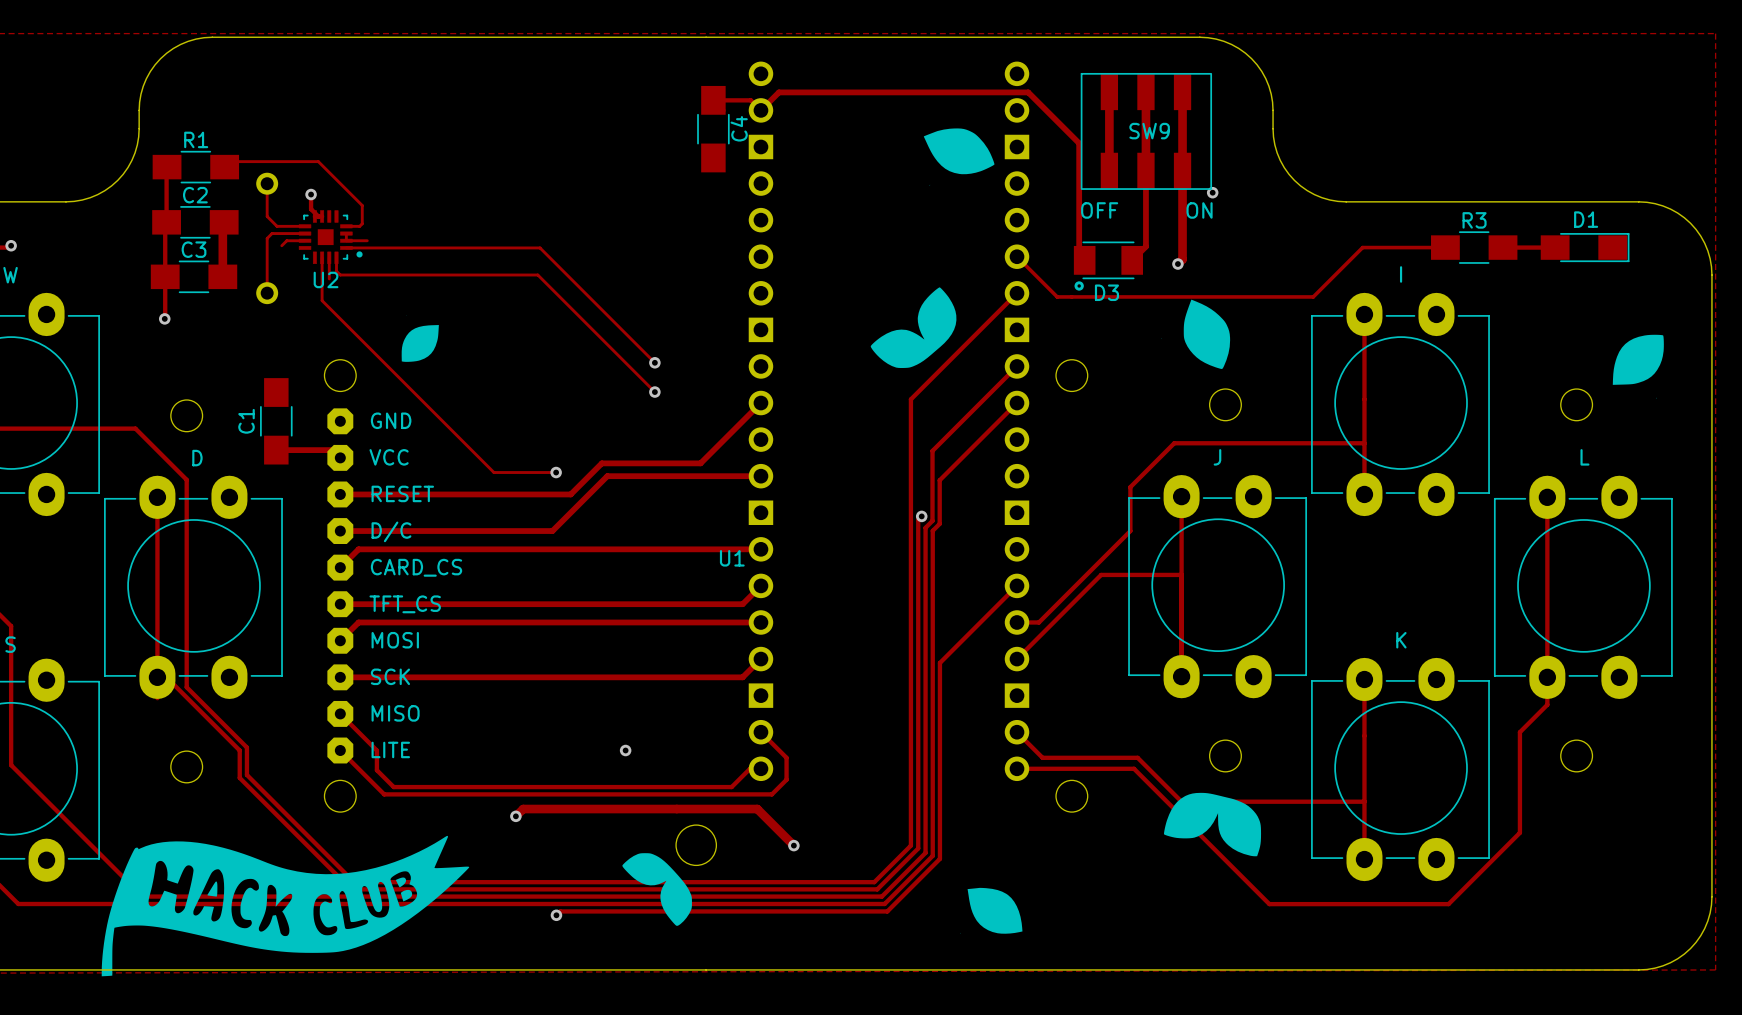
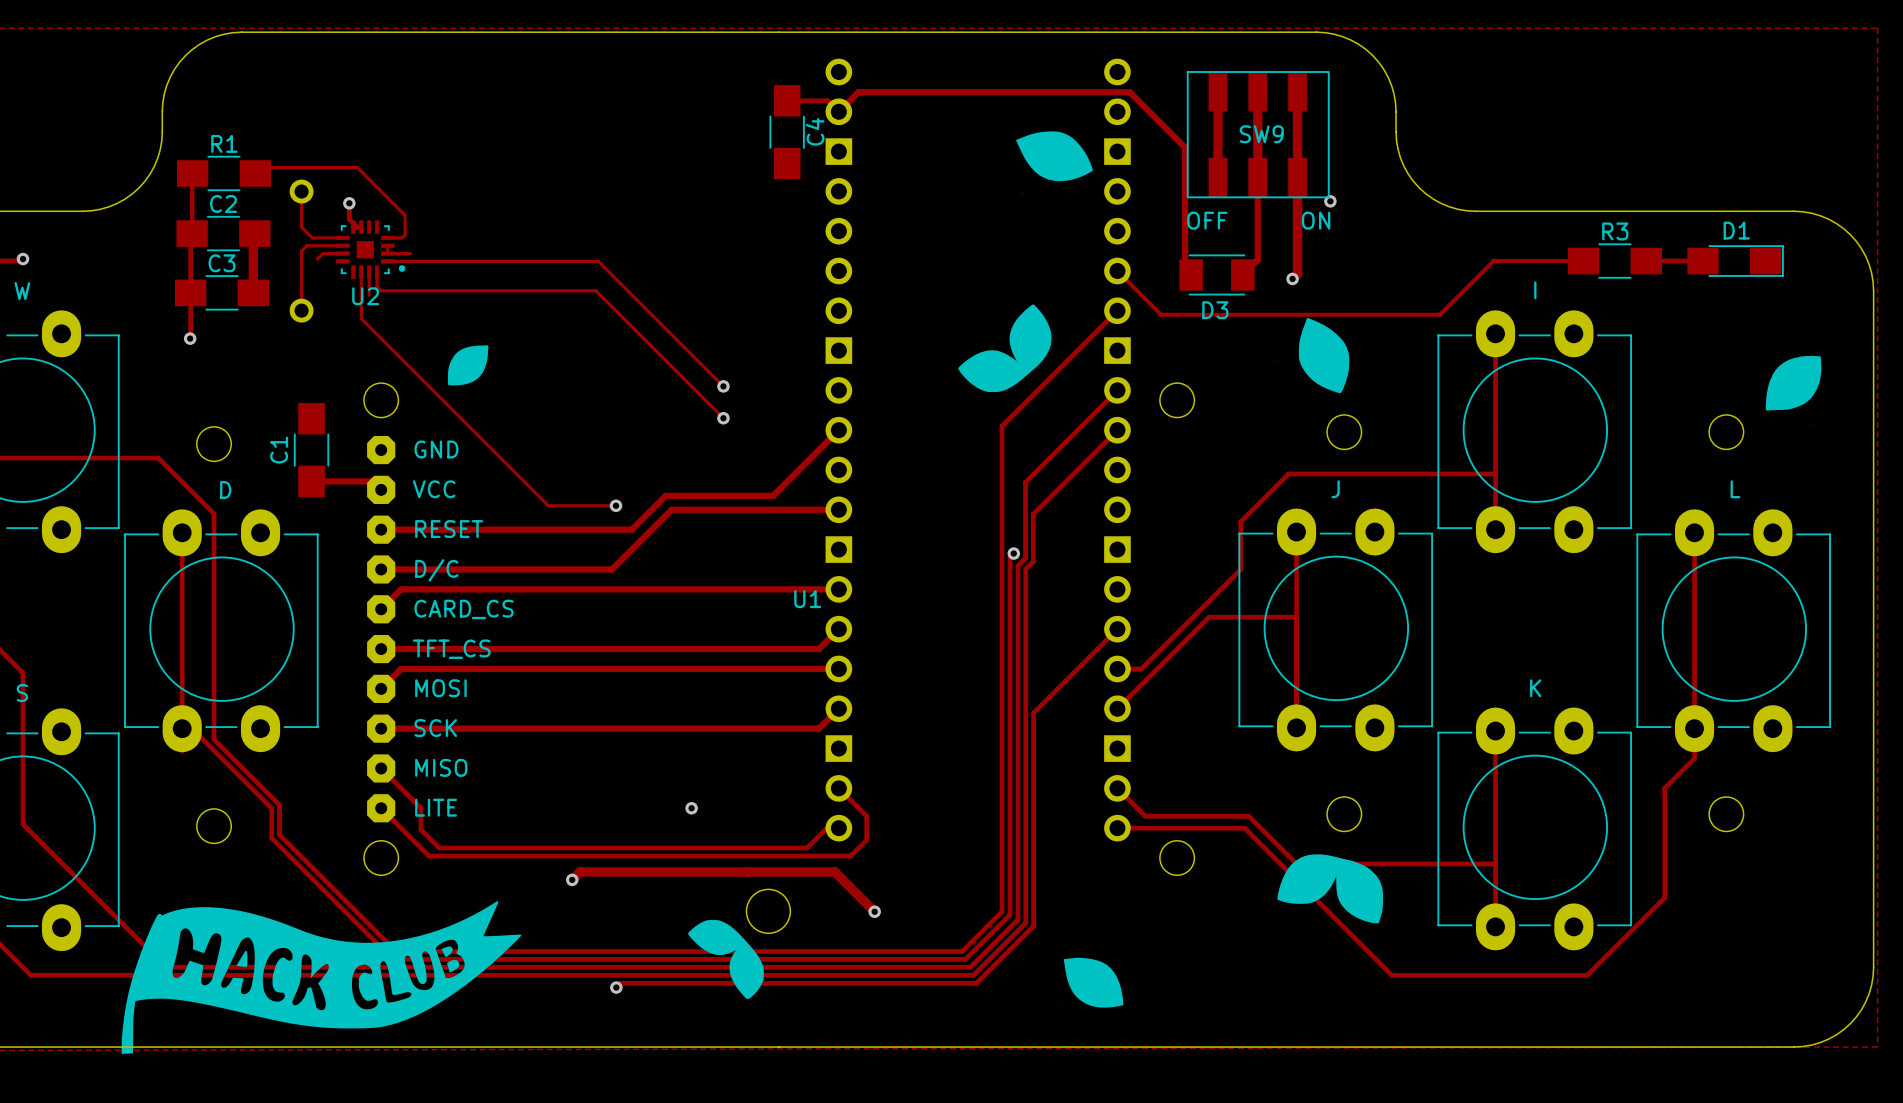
drawing: [1074, 281, 1084, 291] -> none

